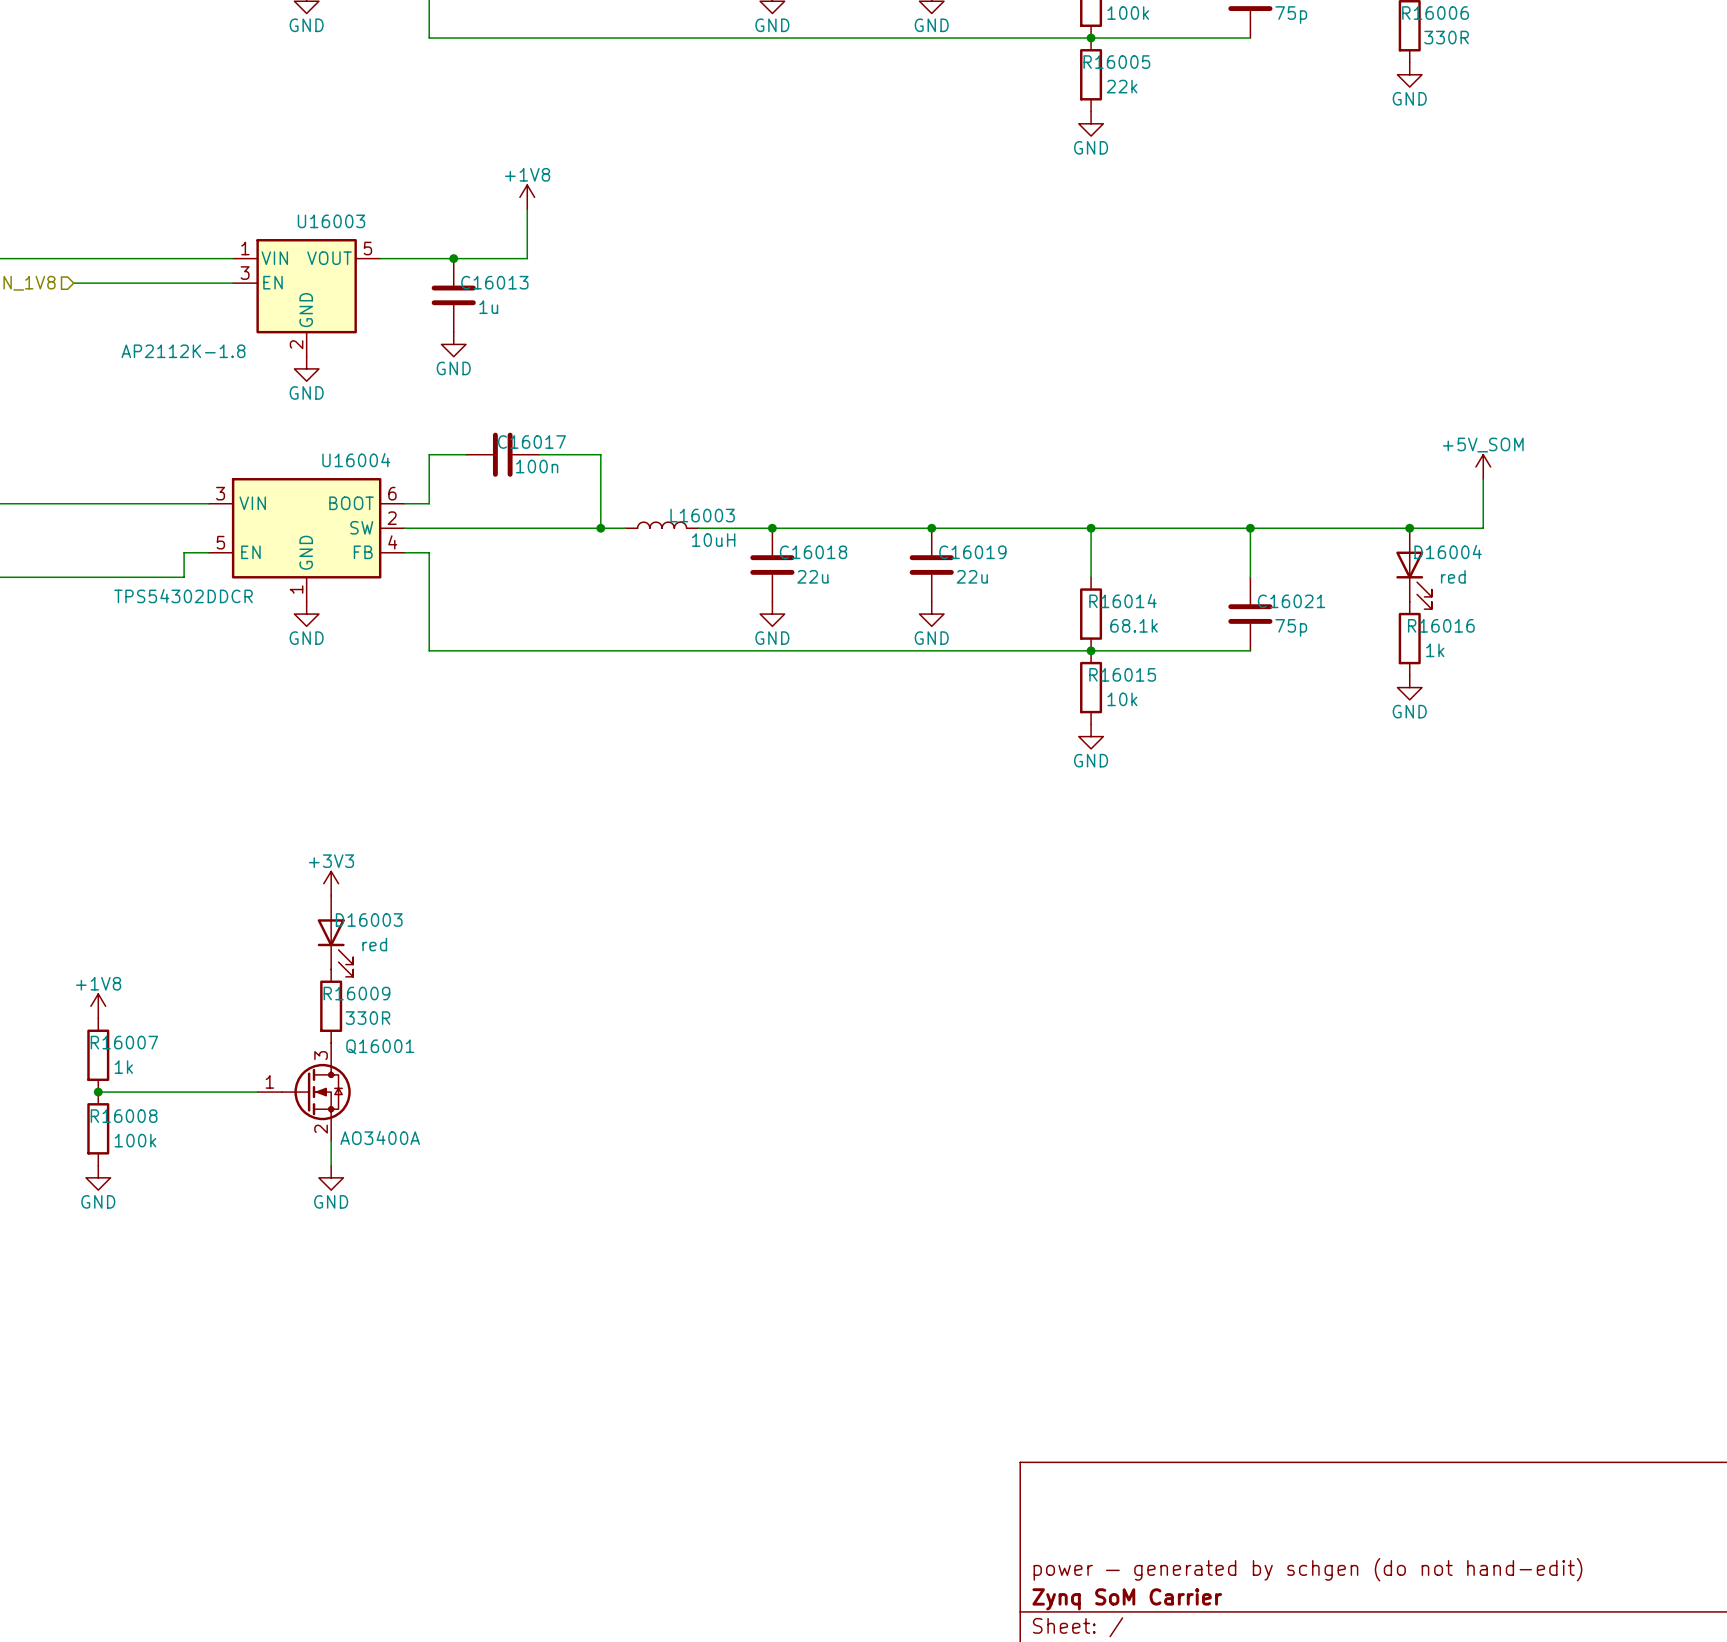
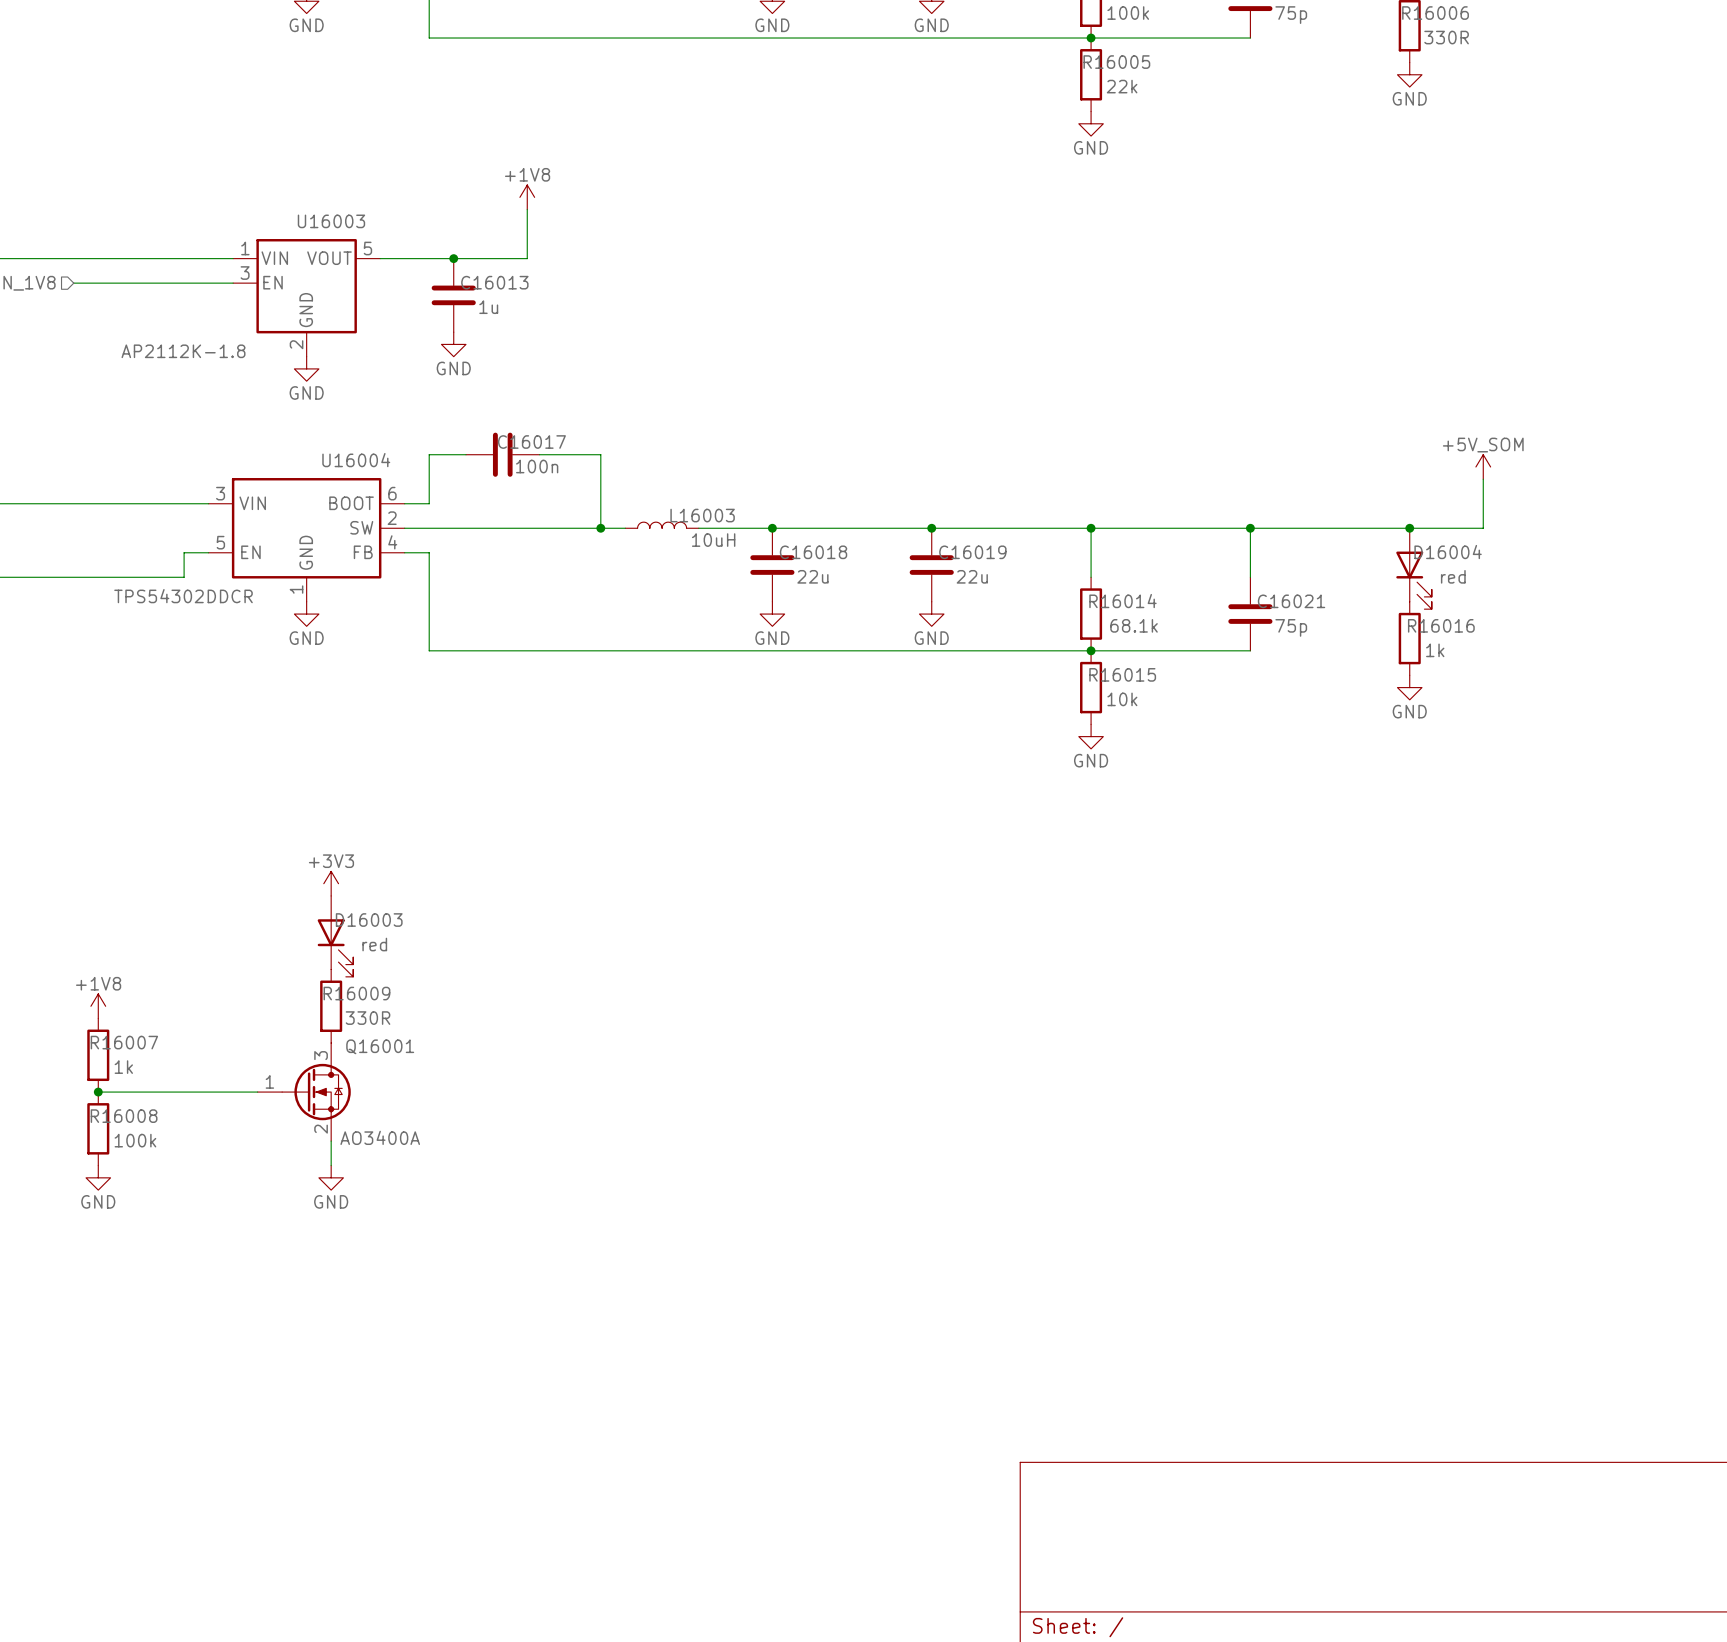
title block: power — generated by schgen (do not hand-edit) (1307, 1569) -> none
title block: Zynq SoM Carrier (1127, 1599) -> none

